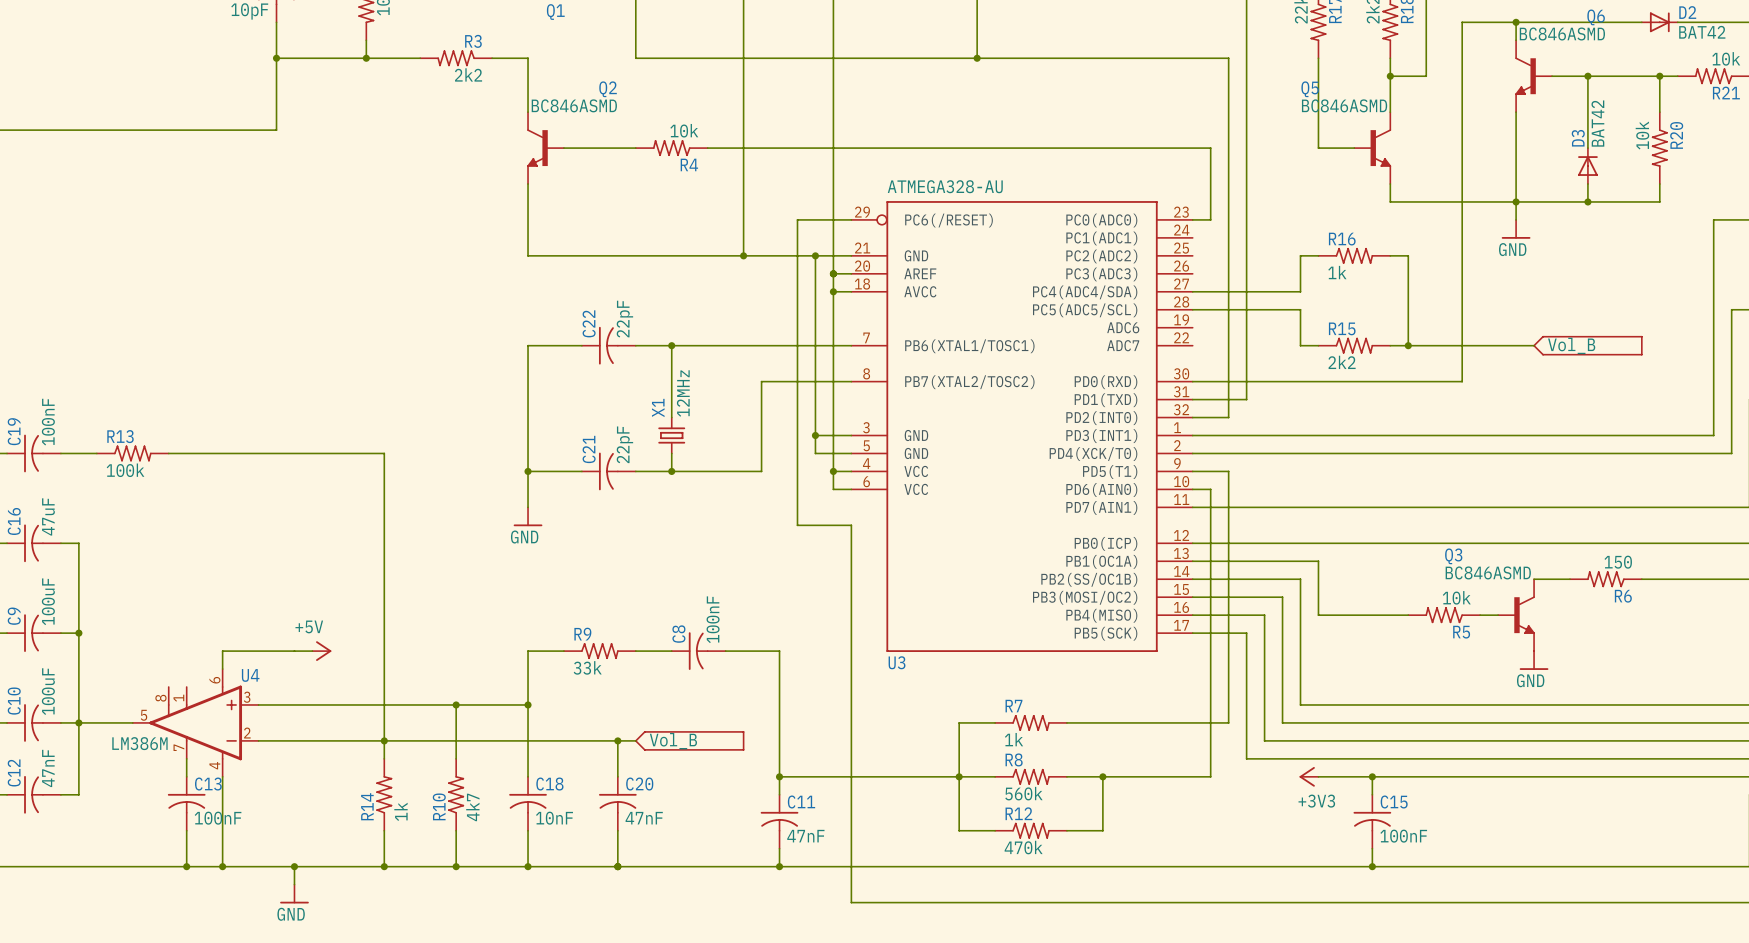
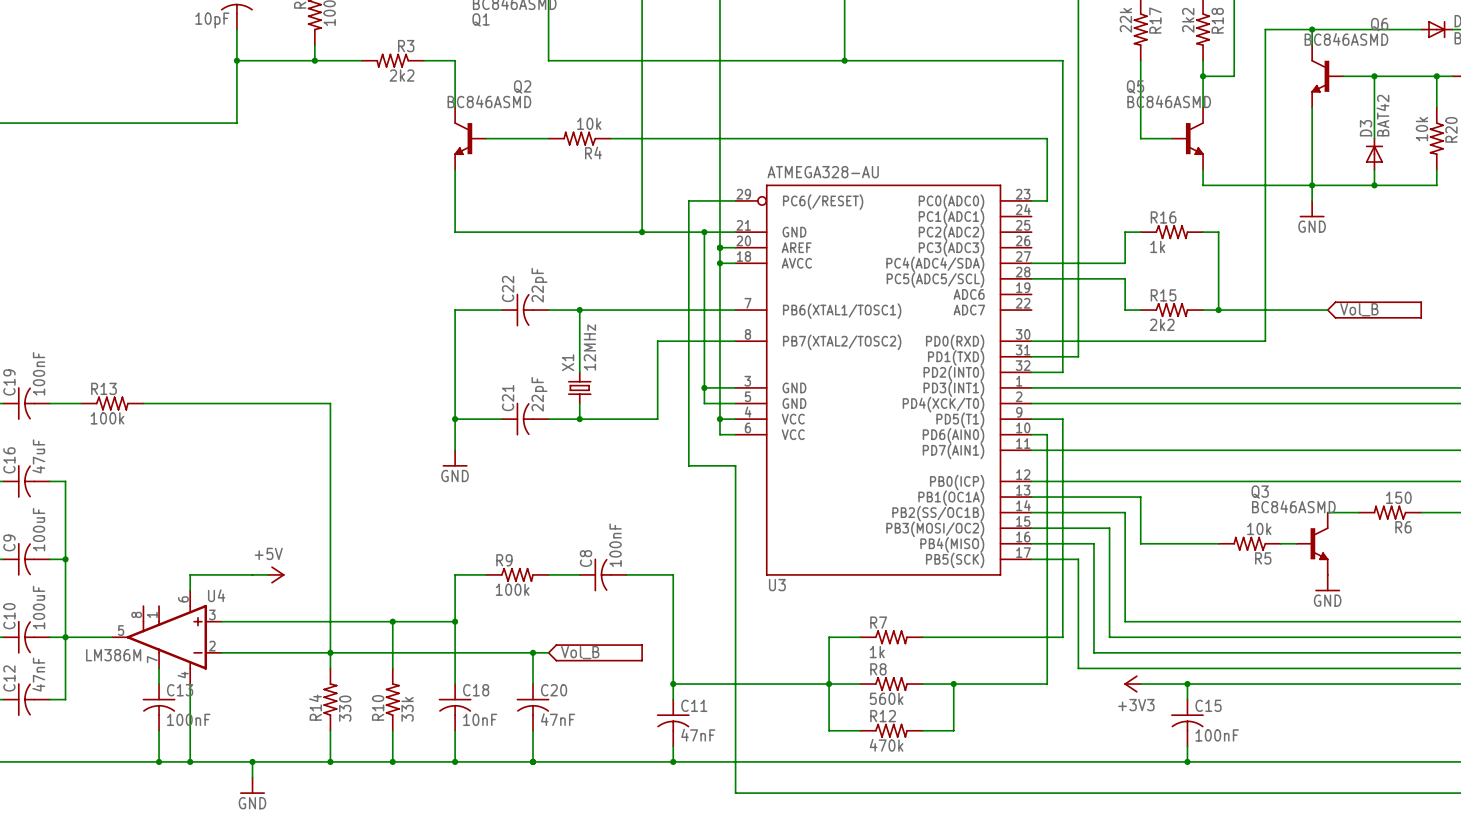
R9 value: 33k (587, 667) -> 100k (512, 589)
R10 value: 4k7 (472, 807) -> 33k (407, 709)
R14 value: 1k (400, 811) -> 330 (345, 708)

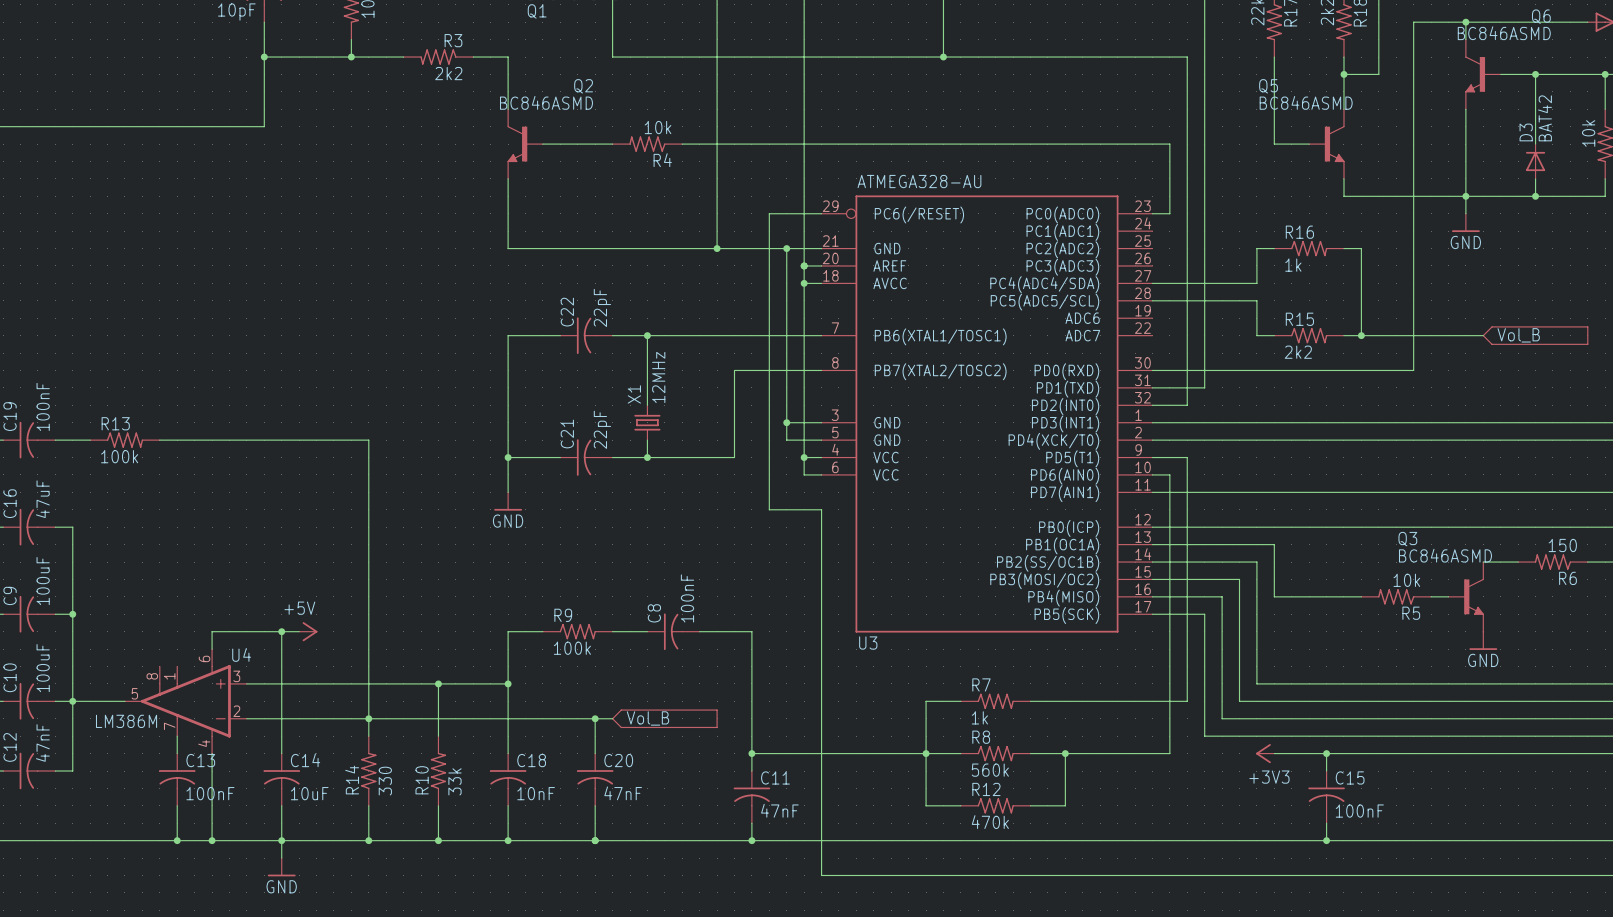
wire: none -> (281, 631) (281, 753)
junction: none -> (281, 631)
C14: none -> 10uF (281, 779)
wire: none -> (281, 805) (281, 840)

